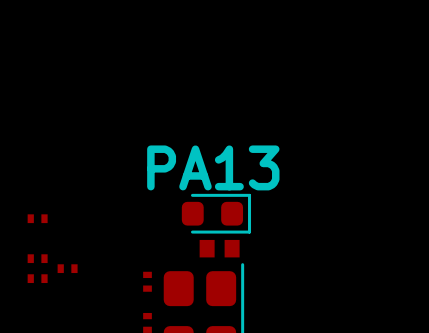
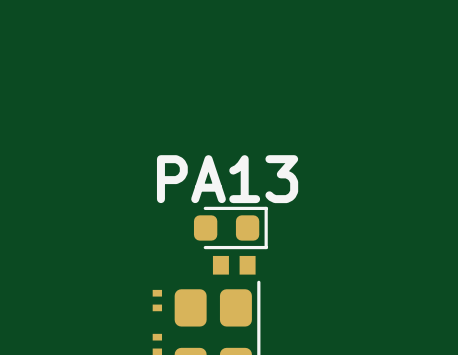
part: (37, 218) -> none
part: (37, 258) -> none
part: (67, 268) -> none
part: (37, 278) -> none

